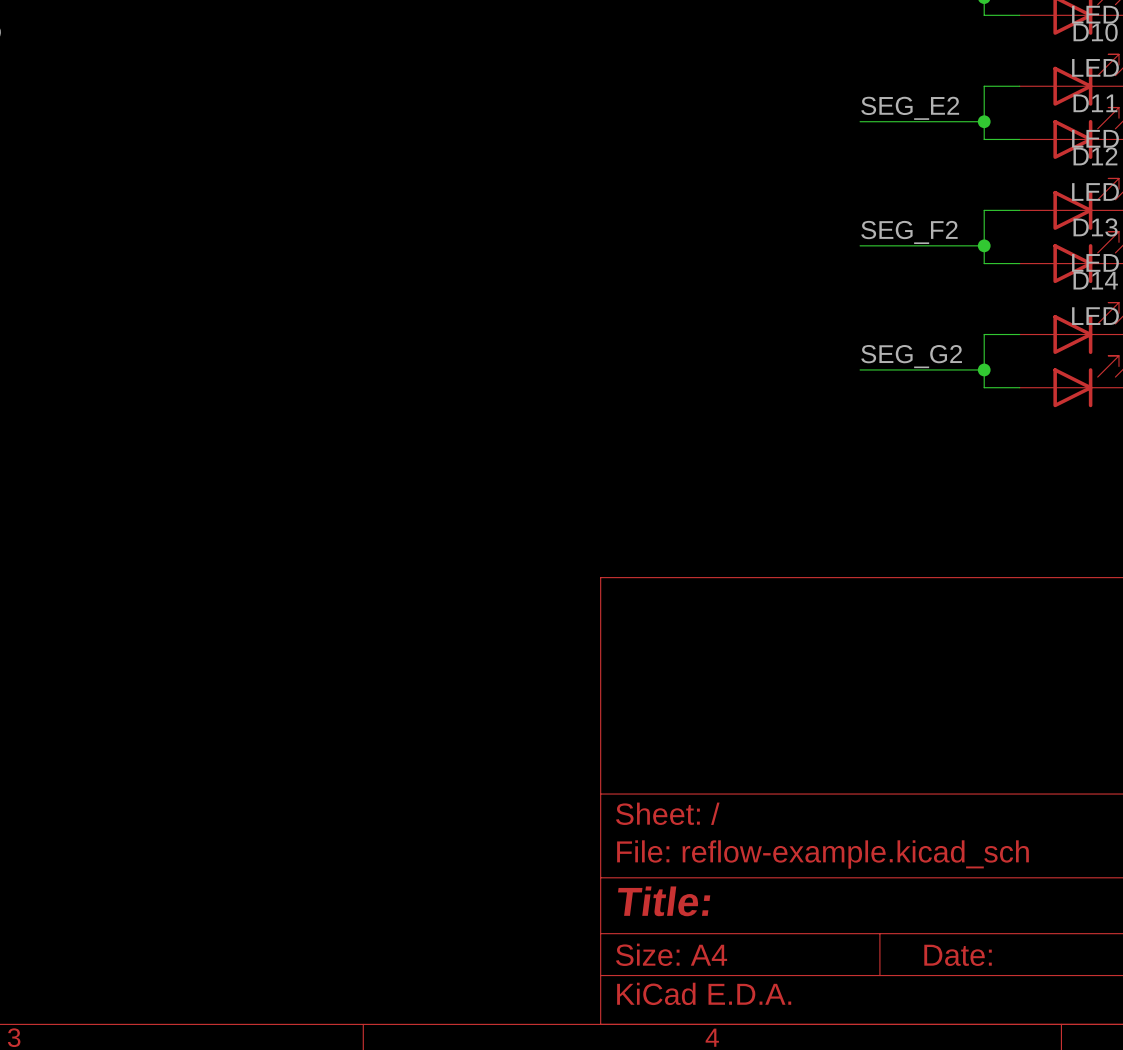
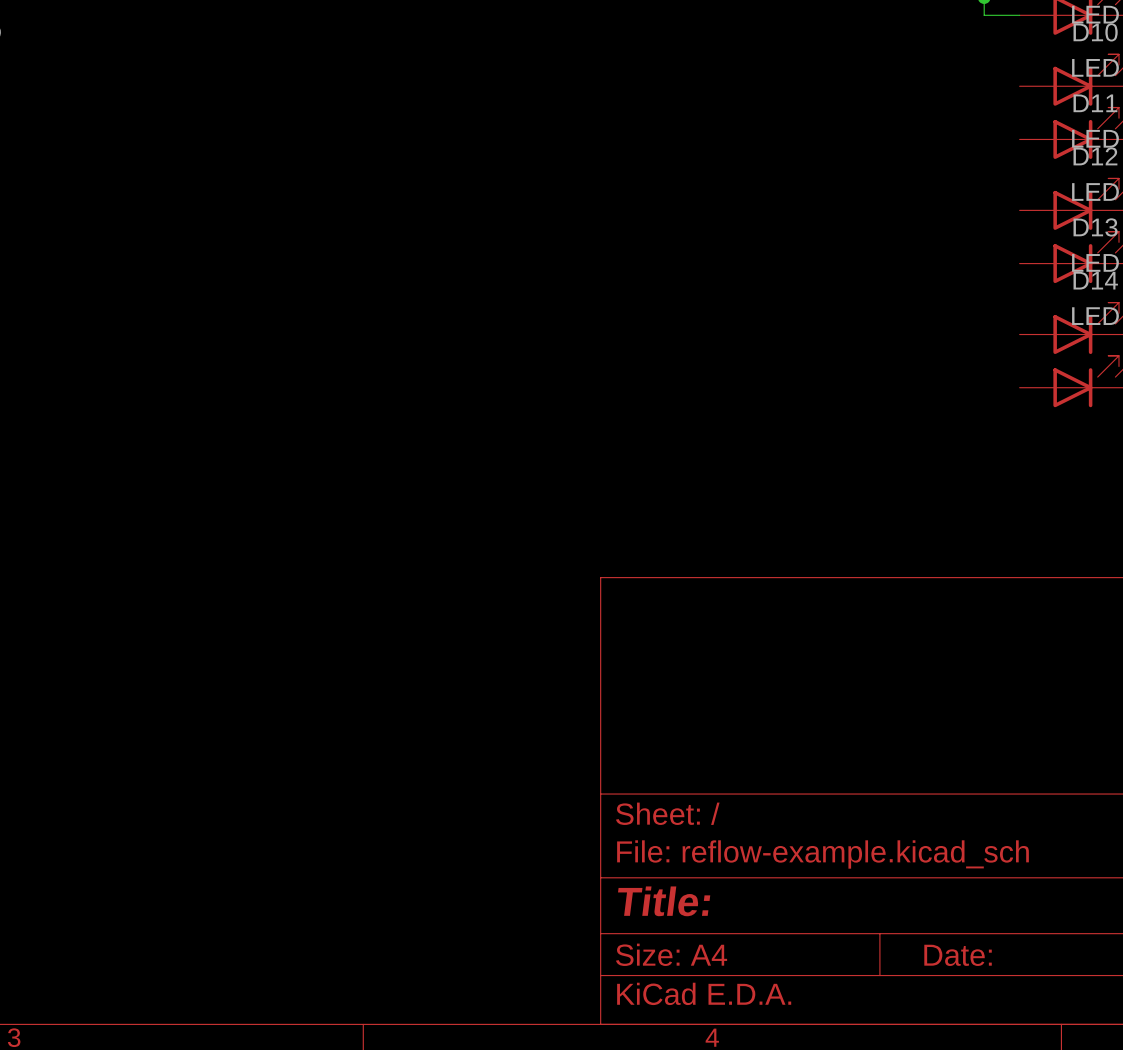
wire: (1019, 86) (984, 86) (984, 139) (1019, 139) -> none
label: SEG_E2 (910, 108) -> none
wire: (860, 121) (984, 121) -> none
junction: (984, 121) -> none
wire: (1019, 210) (984, 210) (984, 263) (1019, 263) -> none
label: SEG_F2 (909, 232) -> none
wire: (860, 245) (984, 245) -> none
junction: (984, 245) -> none
wire: (1019, 334) (984, 334) (984, 387) (1019, 387) -> none
label: SEG_G2 (911, 356) -> none
wire: (860, 369) (984, 369) -> none
junction: (984, 369) -> none

